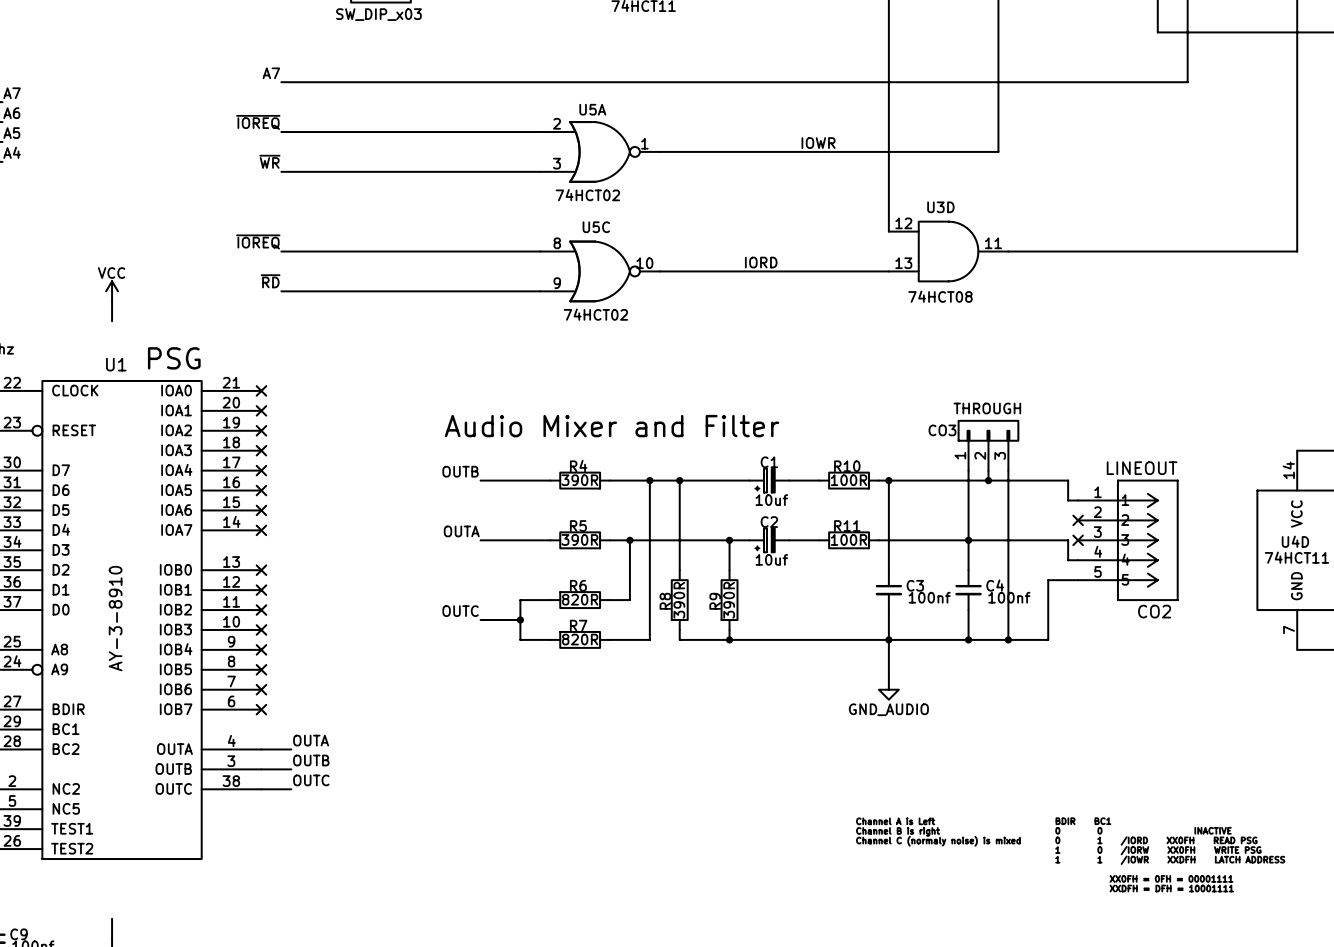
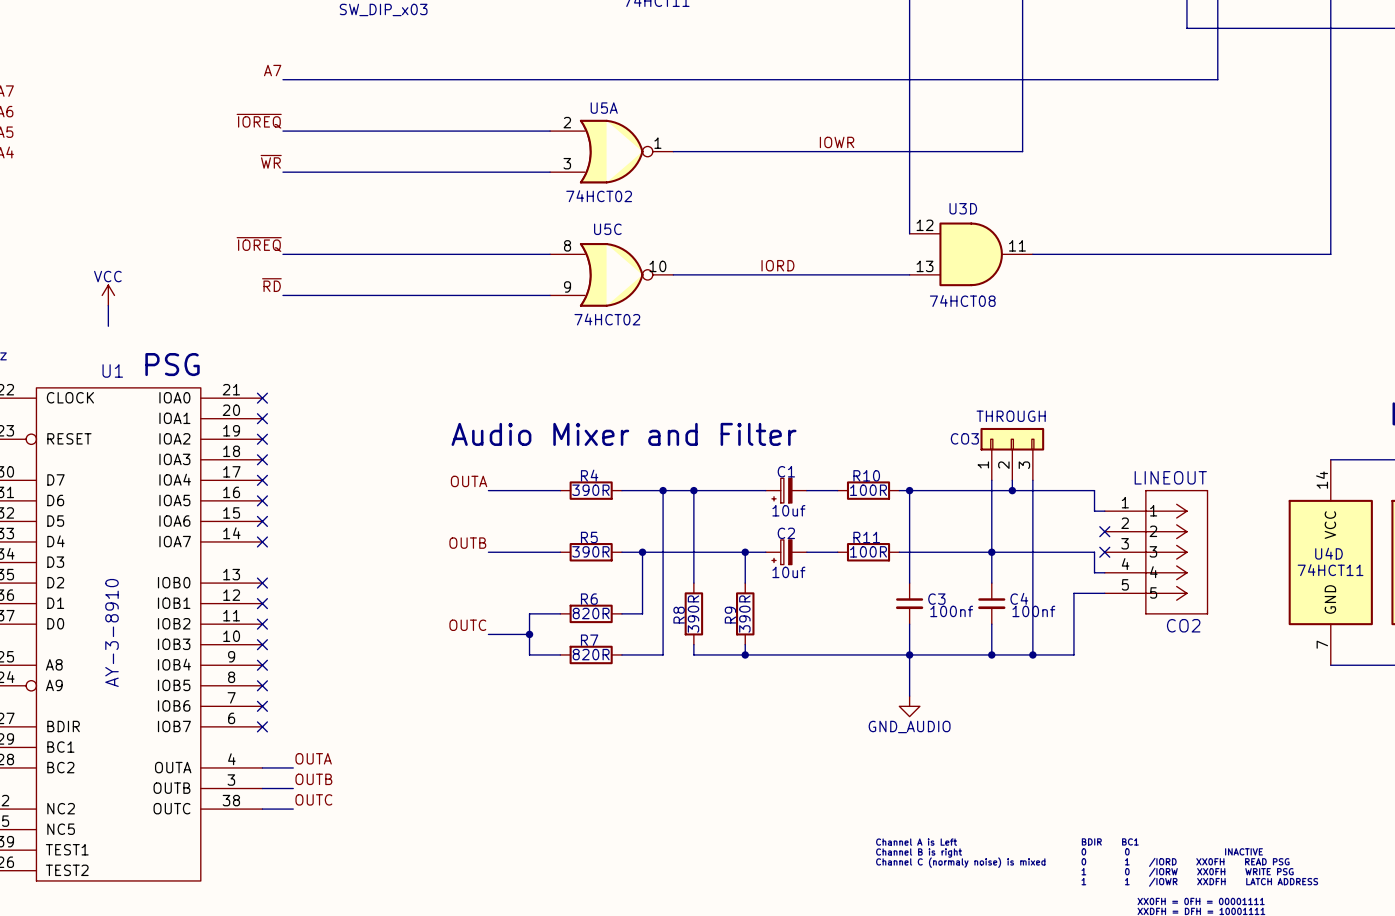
label: OUTB (460, 471) -> OUTA (469, 481)
label: OUTA (461, 531) -> OUTB (467, 543)

